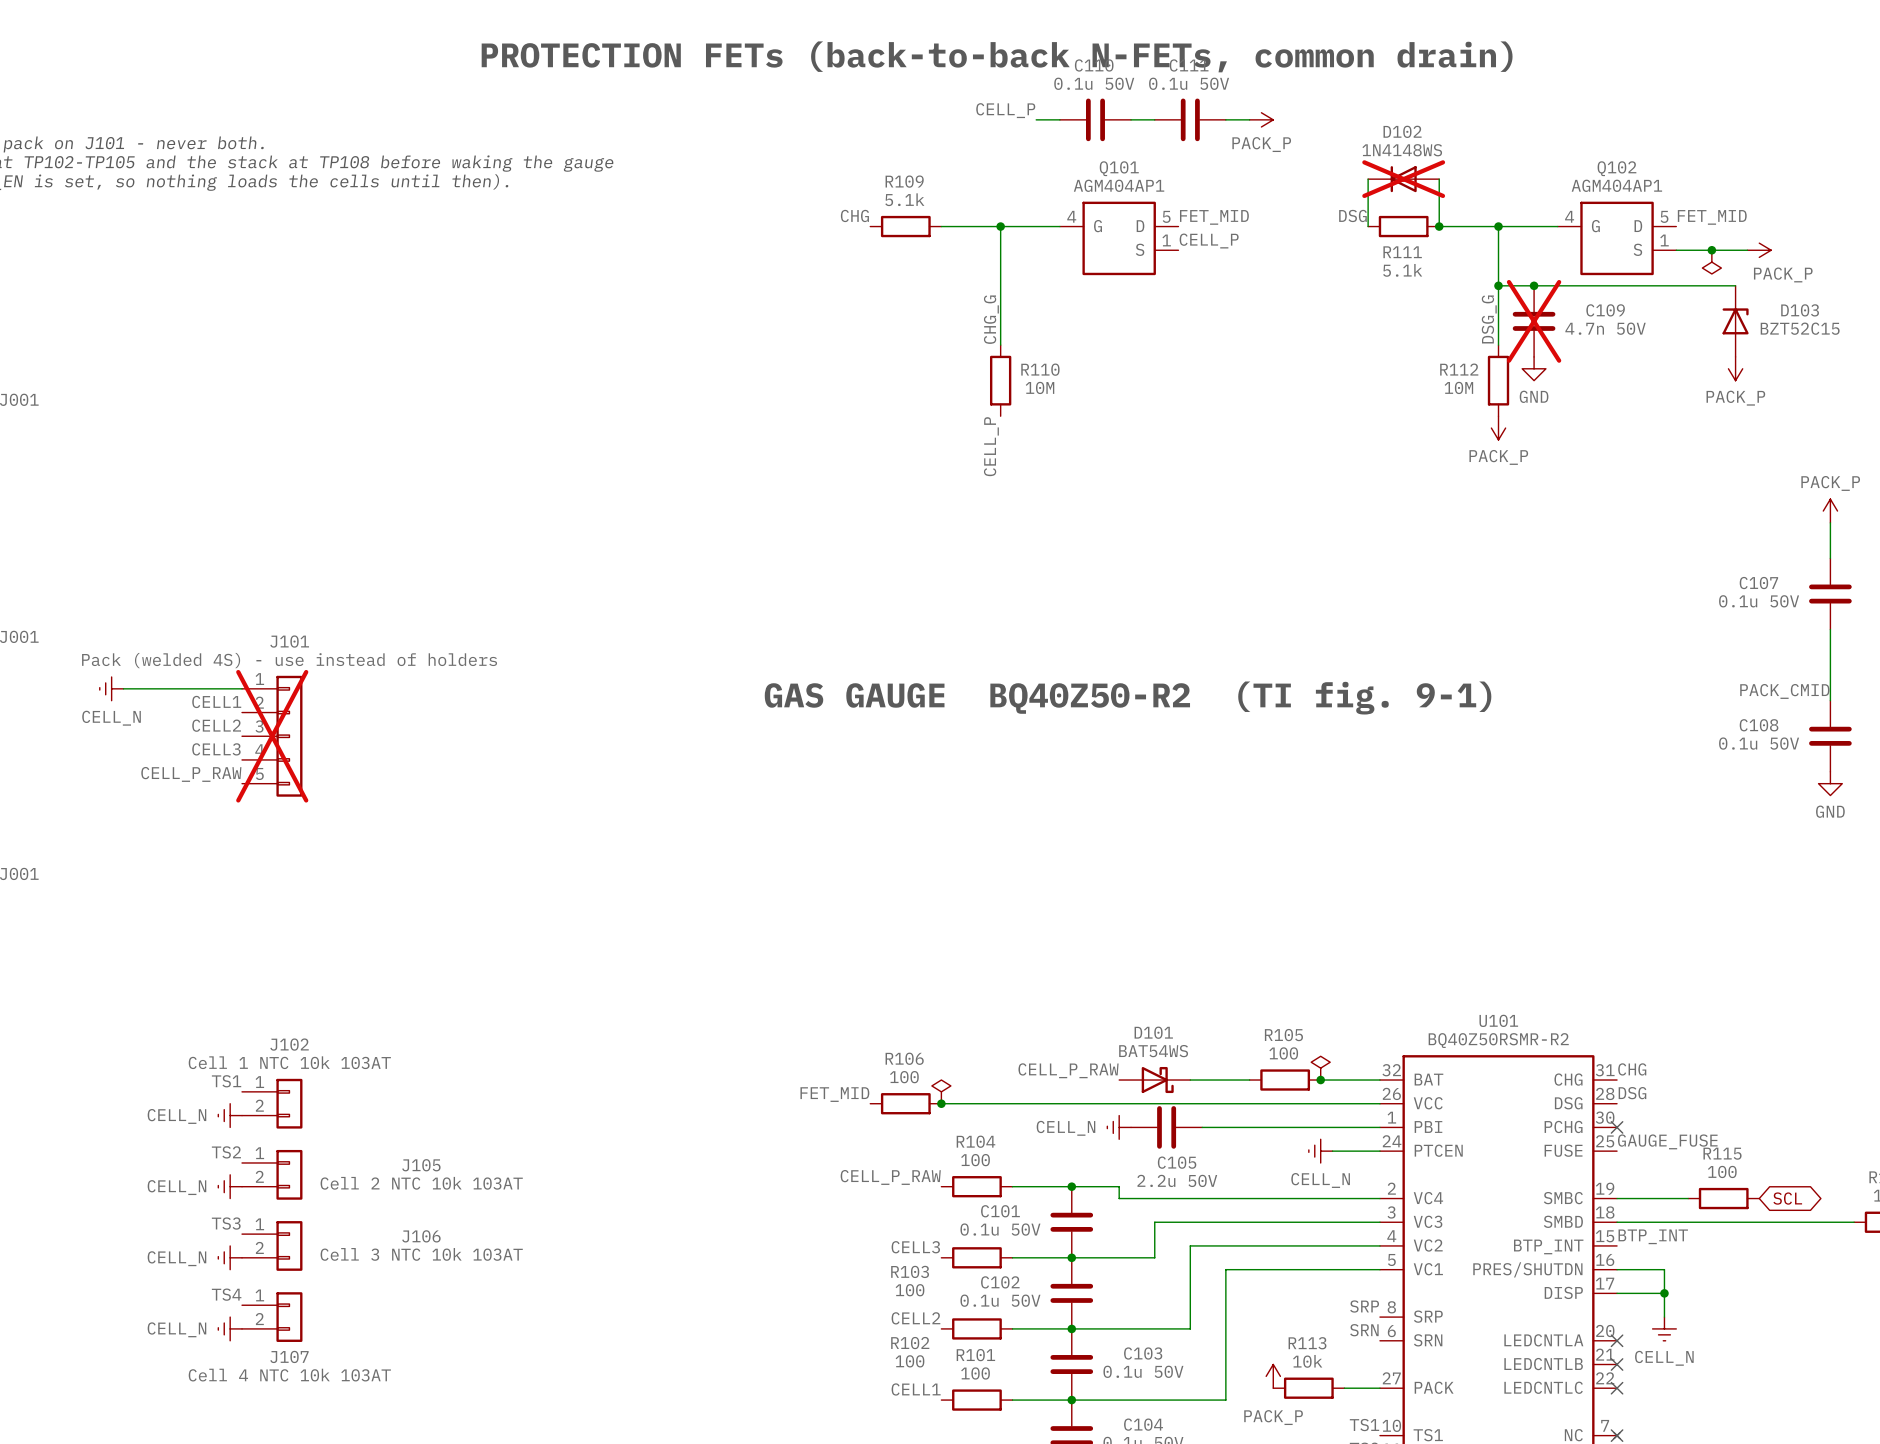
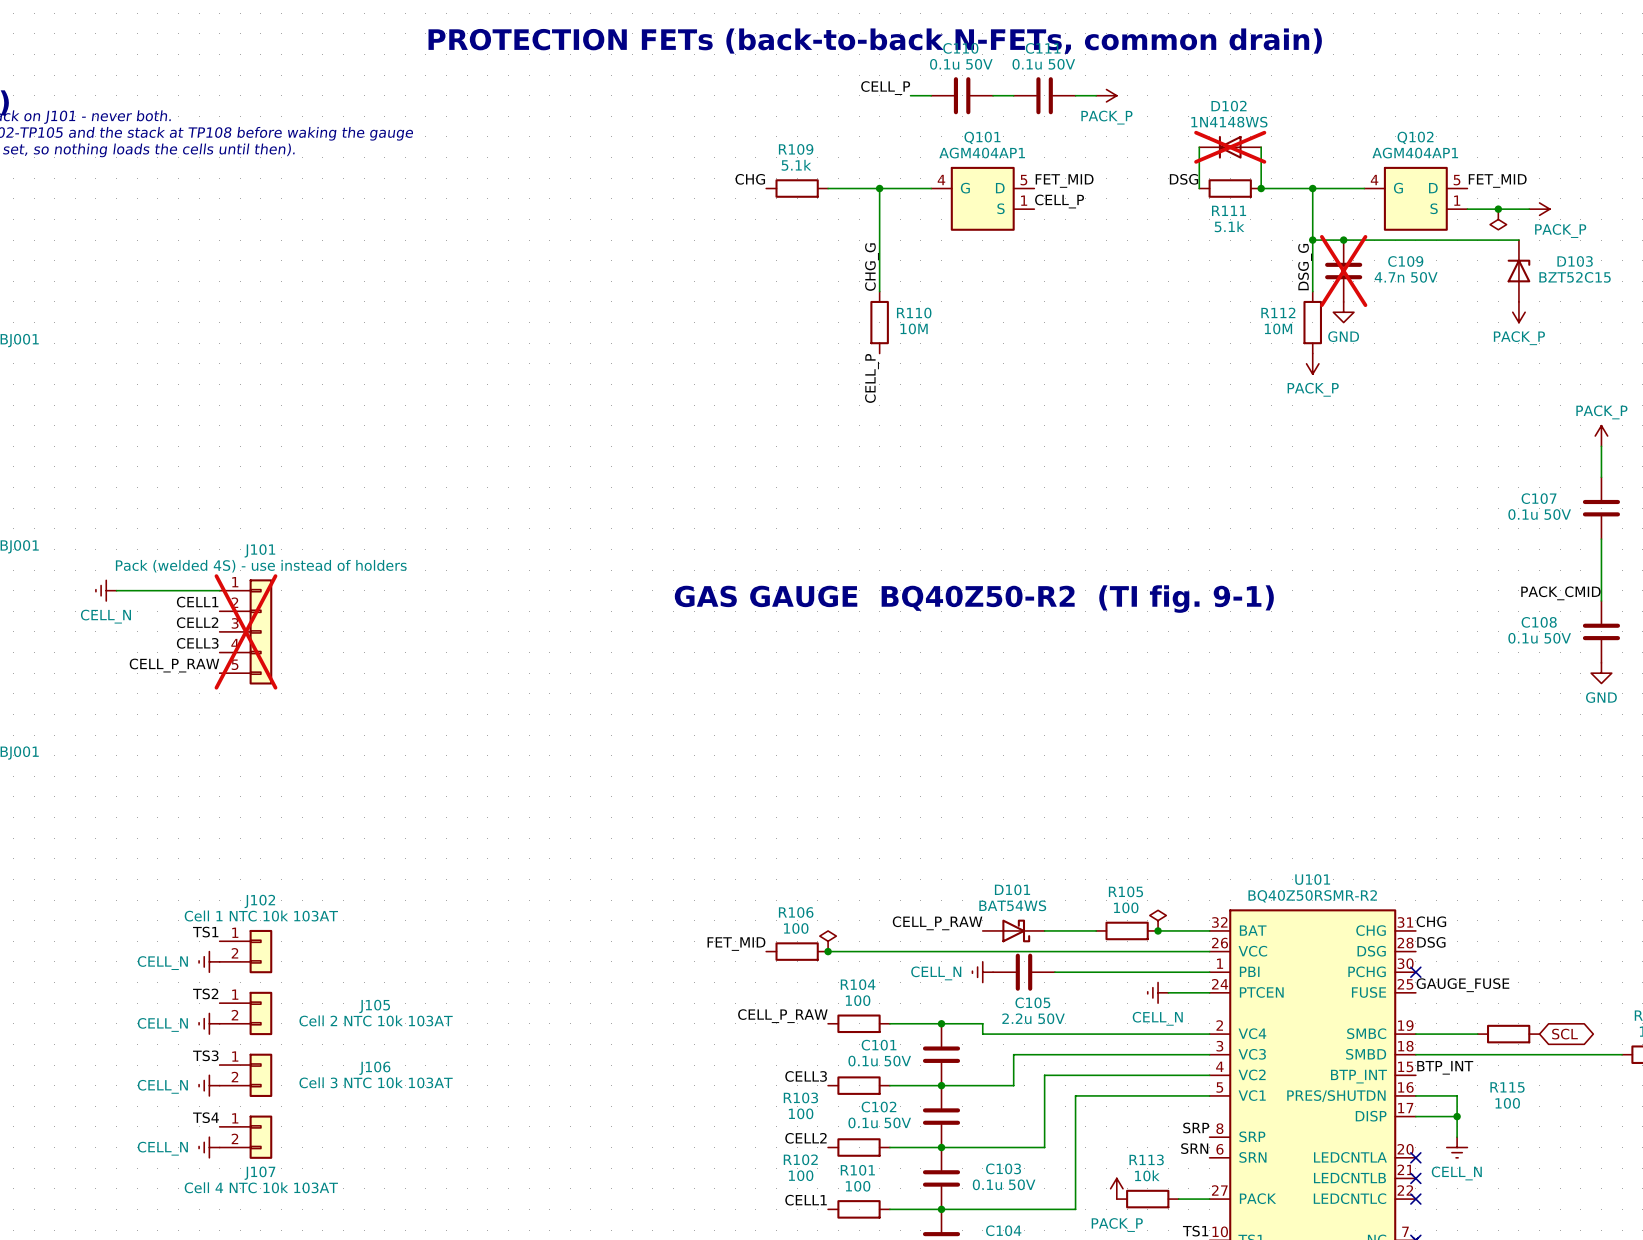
R115 name position: R115 (1722, 1153) -> R115 (1507, 1087)
R115 value position: 100 (1722, 1171) -> 100 (1507, 1103)

